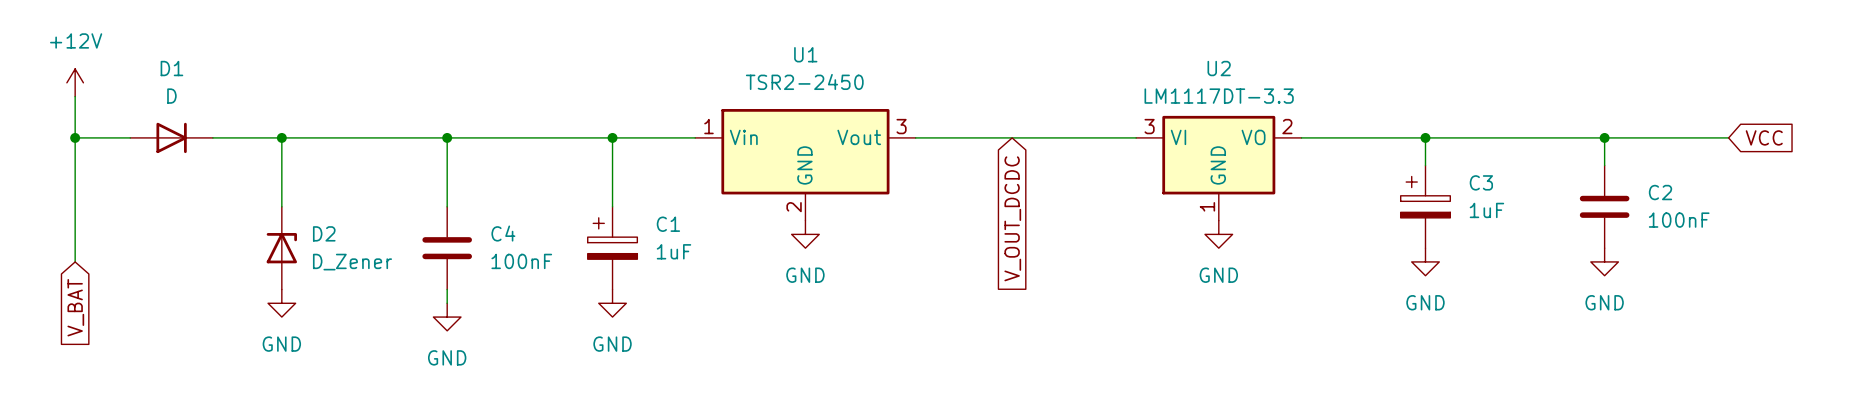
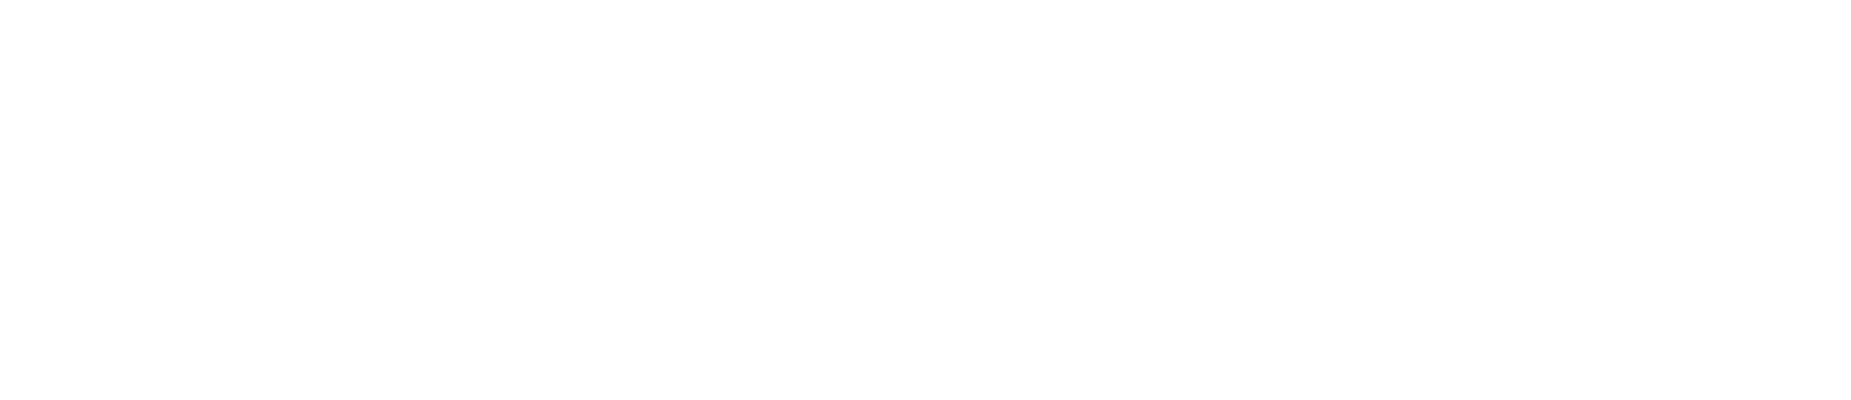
power symbol: +12V (75, 82) -> none
wire: (75, 96) (75, 261) -> none
wire: (75, 137) (130, 137) -> none
junction: (75, 137) -> none
D1: D (171, 137) -> none
wire: (212, 137) (695, 137) -> none
wire: (281, 137) (281, 206) -> none
junction: (281, 137) -> none
wire: (447, 137) (447, 206) -> none
junction: (447, 137) -> none
wire: (612, 137) (612, 206) -> none
junction: (612, 137) -> none
wire: (915, 137) (1136, 137) -> none
wire: (1301, 137) (1728, 137) -> none
wire: (1425, 137) (1425, 165) -> none
junction: (1425, 137) -> none
wire: (1604, 137) (1604, 165) -> none
junction: (1604, 137) -> none
global label: VCC (1764, 137) -> none
U1: TSR2-2450 (805, 164) -> none
U2: LM1117DT-3.3 (1218, 168) -> none
C3: 1uF (1425, 206) -> none
C2: 100nF (1604, 206) -> none
global label: V_OUT_DCDC (1012, 218) -> none
power symbol: GND (805, 234) -> none
power symbol: GND (1218, 234) -> none
D2: D_Zener (281, 248) -> none
C4: 100nF (447, 248) -> none
C1: 1uF (612, 248) -> none
power symbol: GND (1425, 261) -> none
power symbol: GND (1604, 261) -> none
wire: (447, 289) (447, 303) -> none
power symbol: GND (281, 303) -> none
power symbol: GND (612, 303) -> none
global label: V_BAT (75, 307) -> none
power symbol: GND (447, 317) -> none

